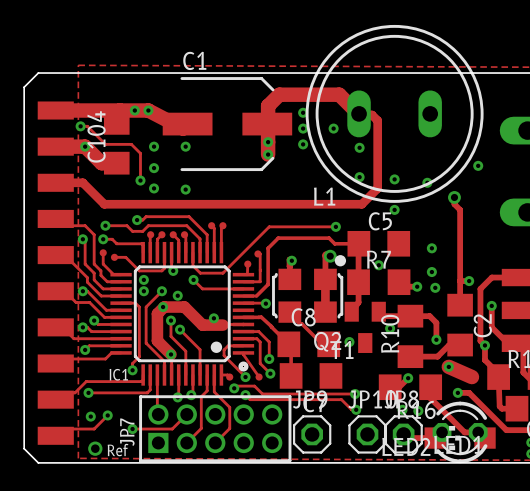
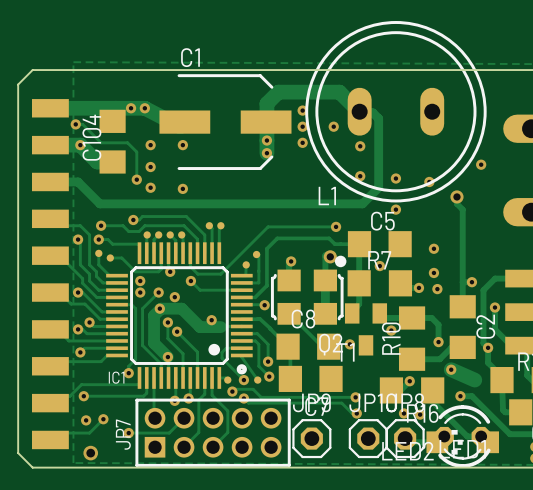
text: Ref (118, 450) -> none

